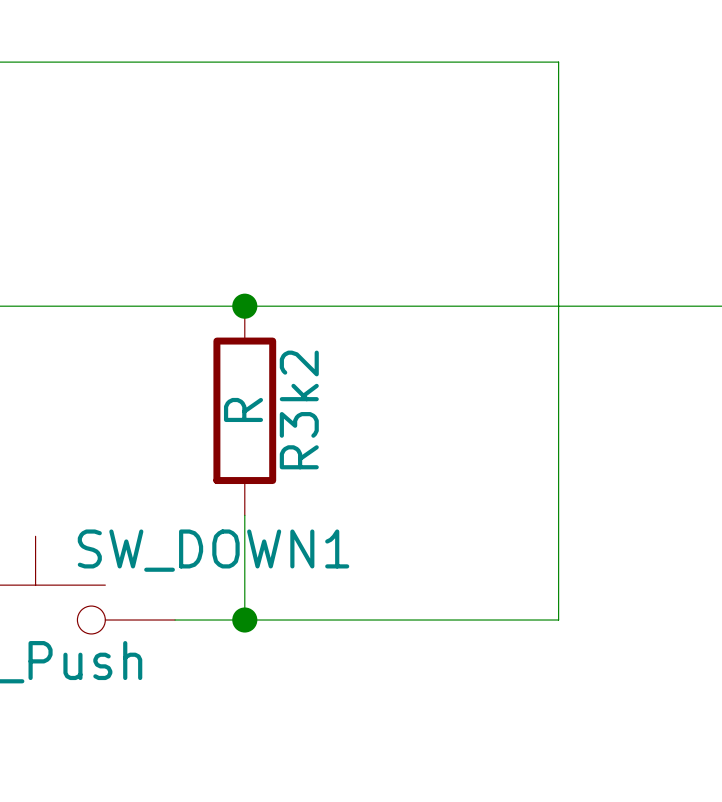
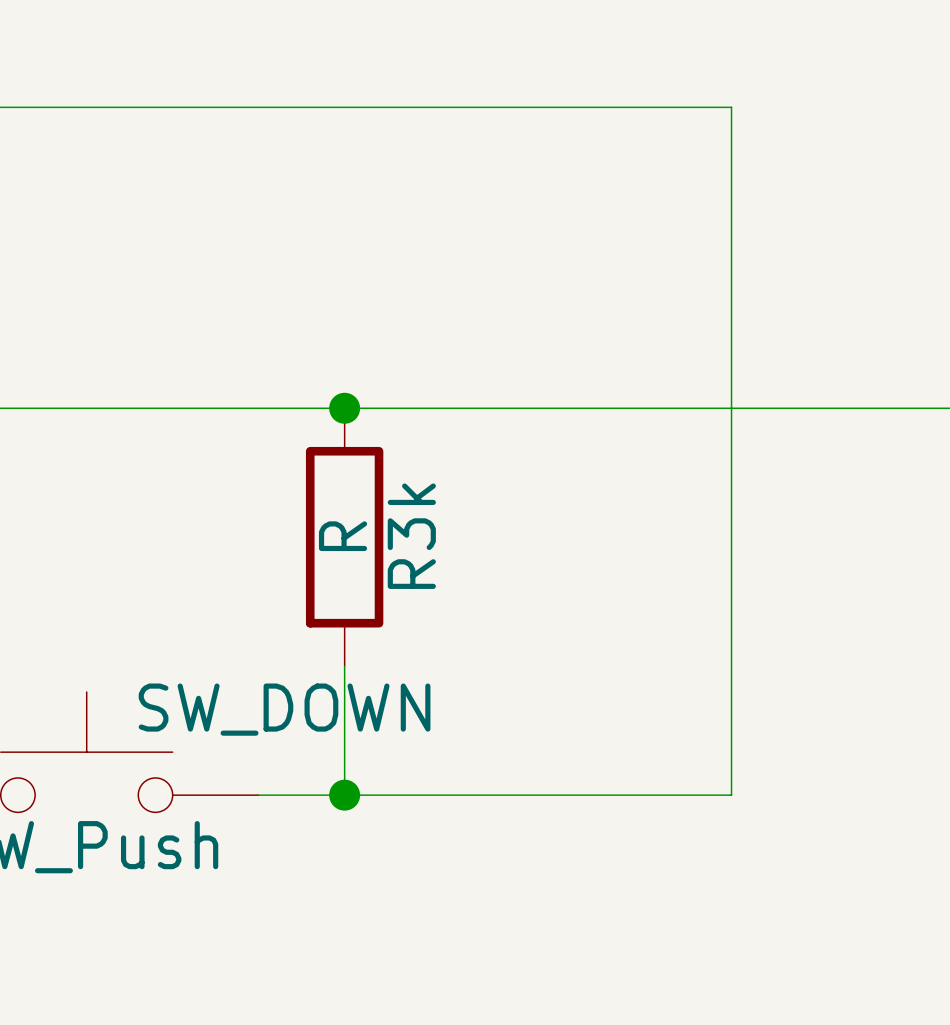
R3k2 name: R3k2 (299, 409) -> R3k (411, 536)
SW_DOWN1 name: SW_DOWN1 (213, 550) -> SW_DOWN (284, 709)

